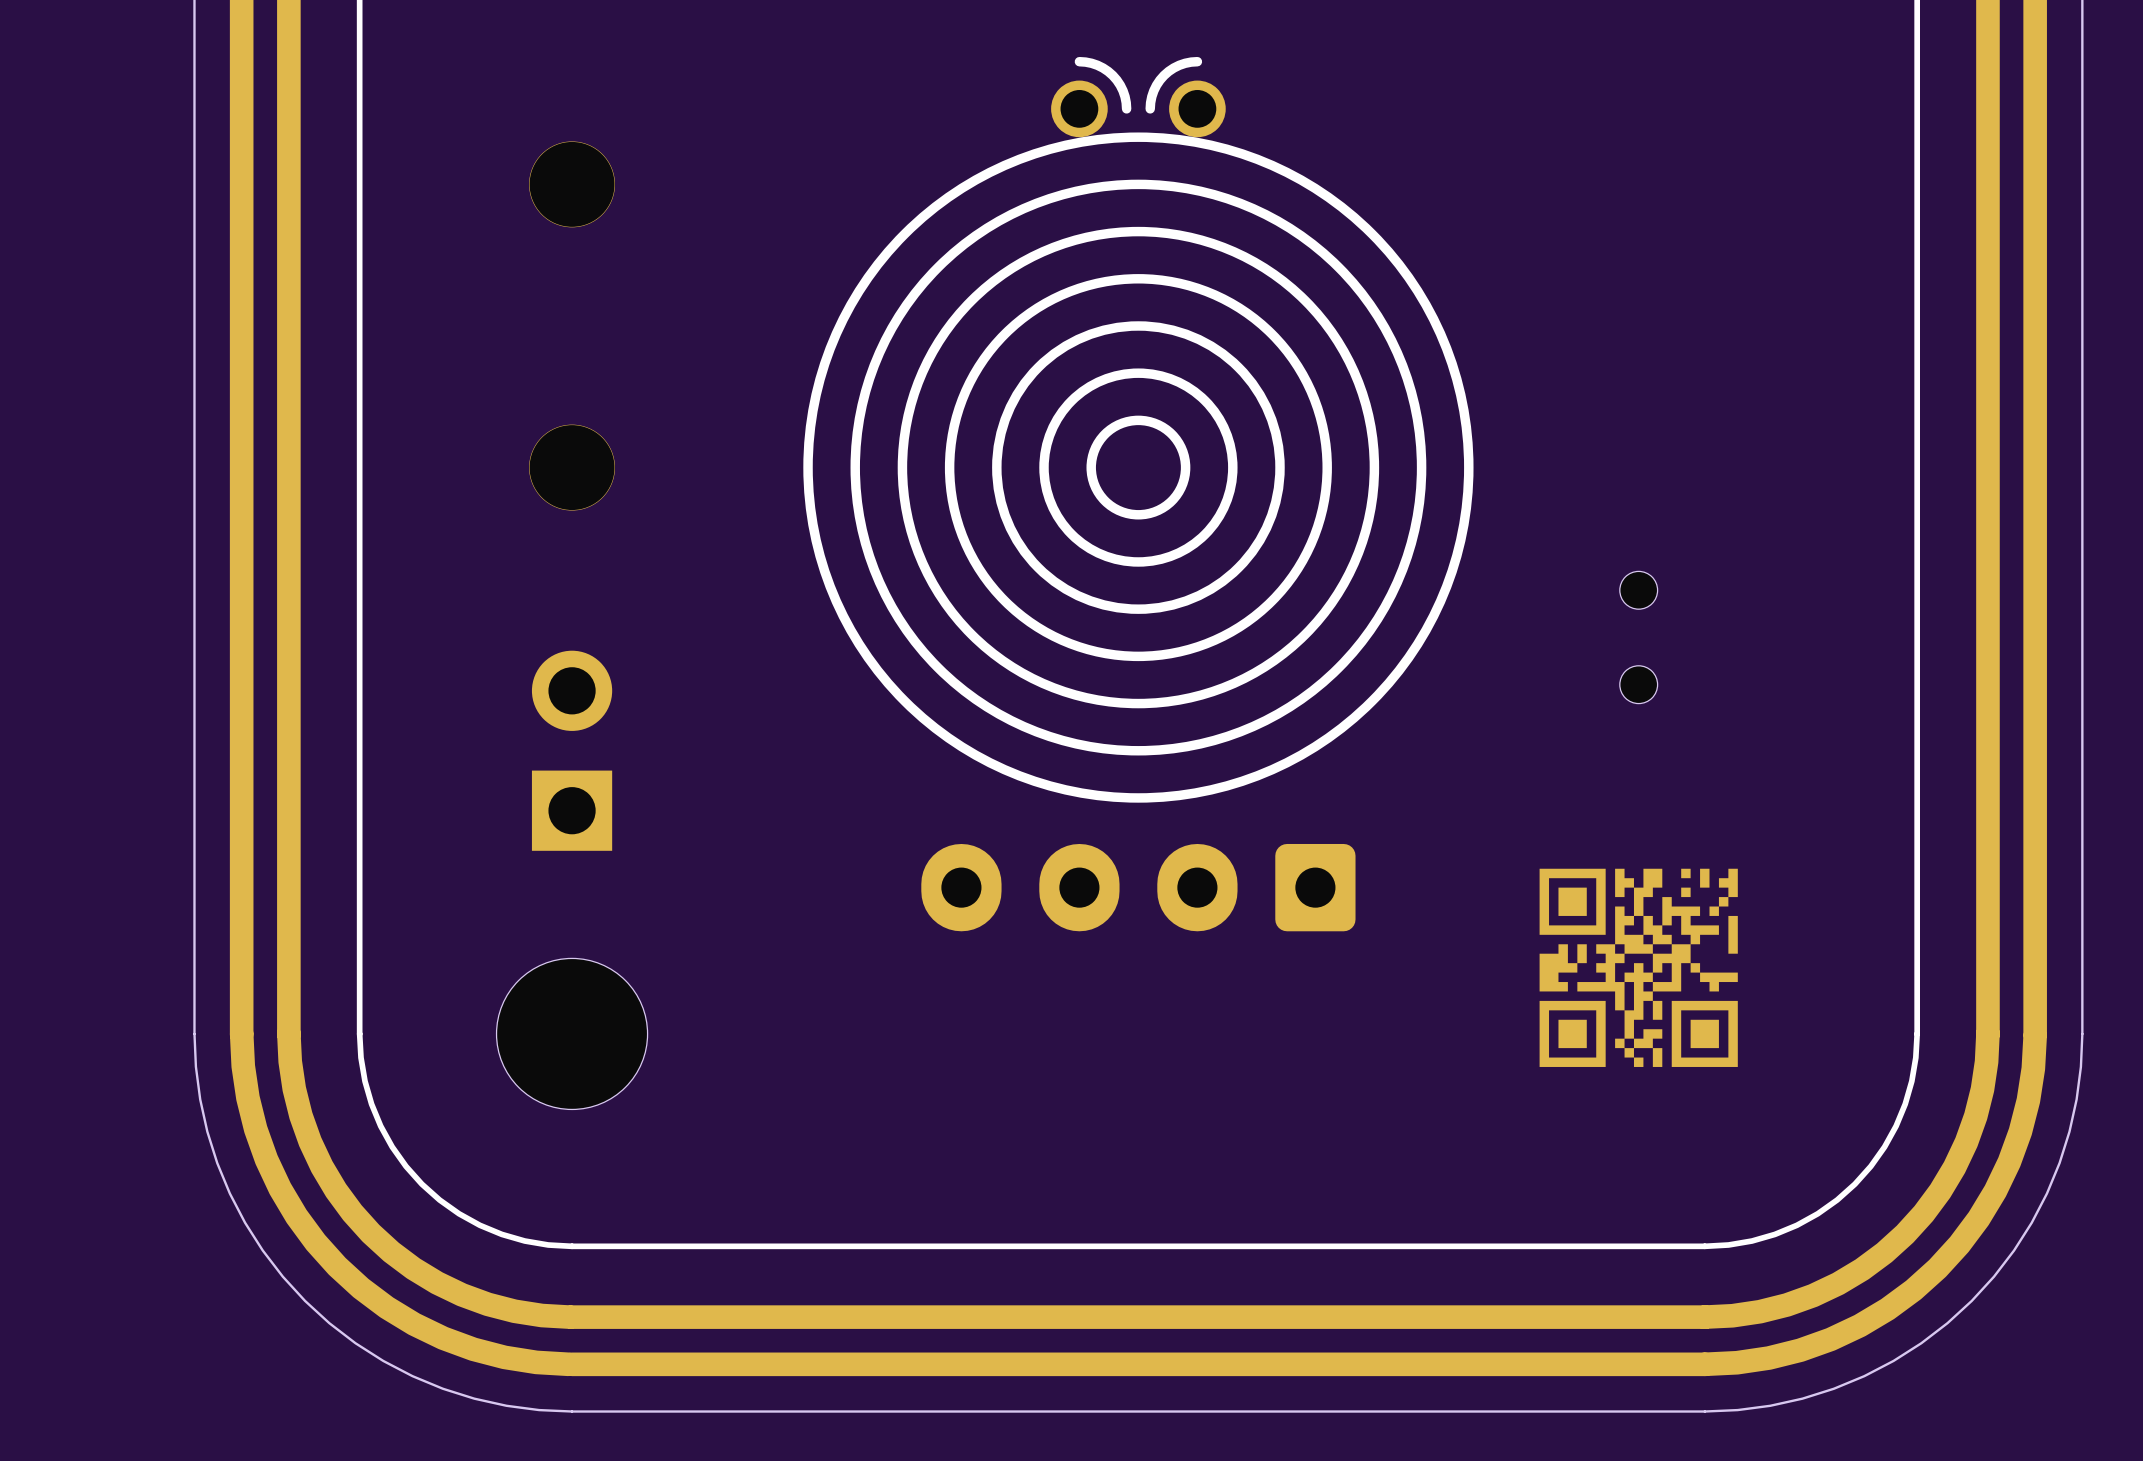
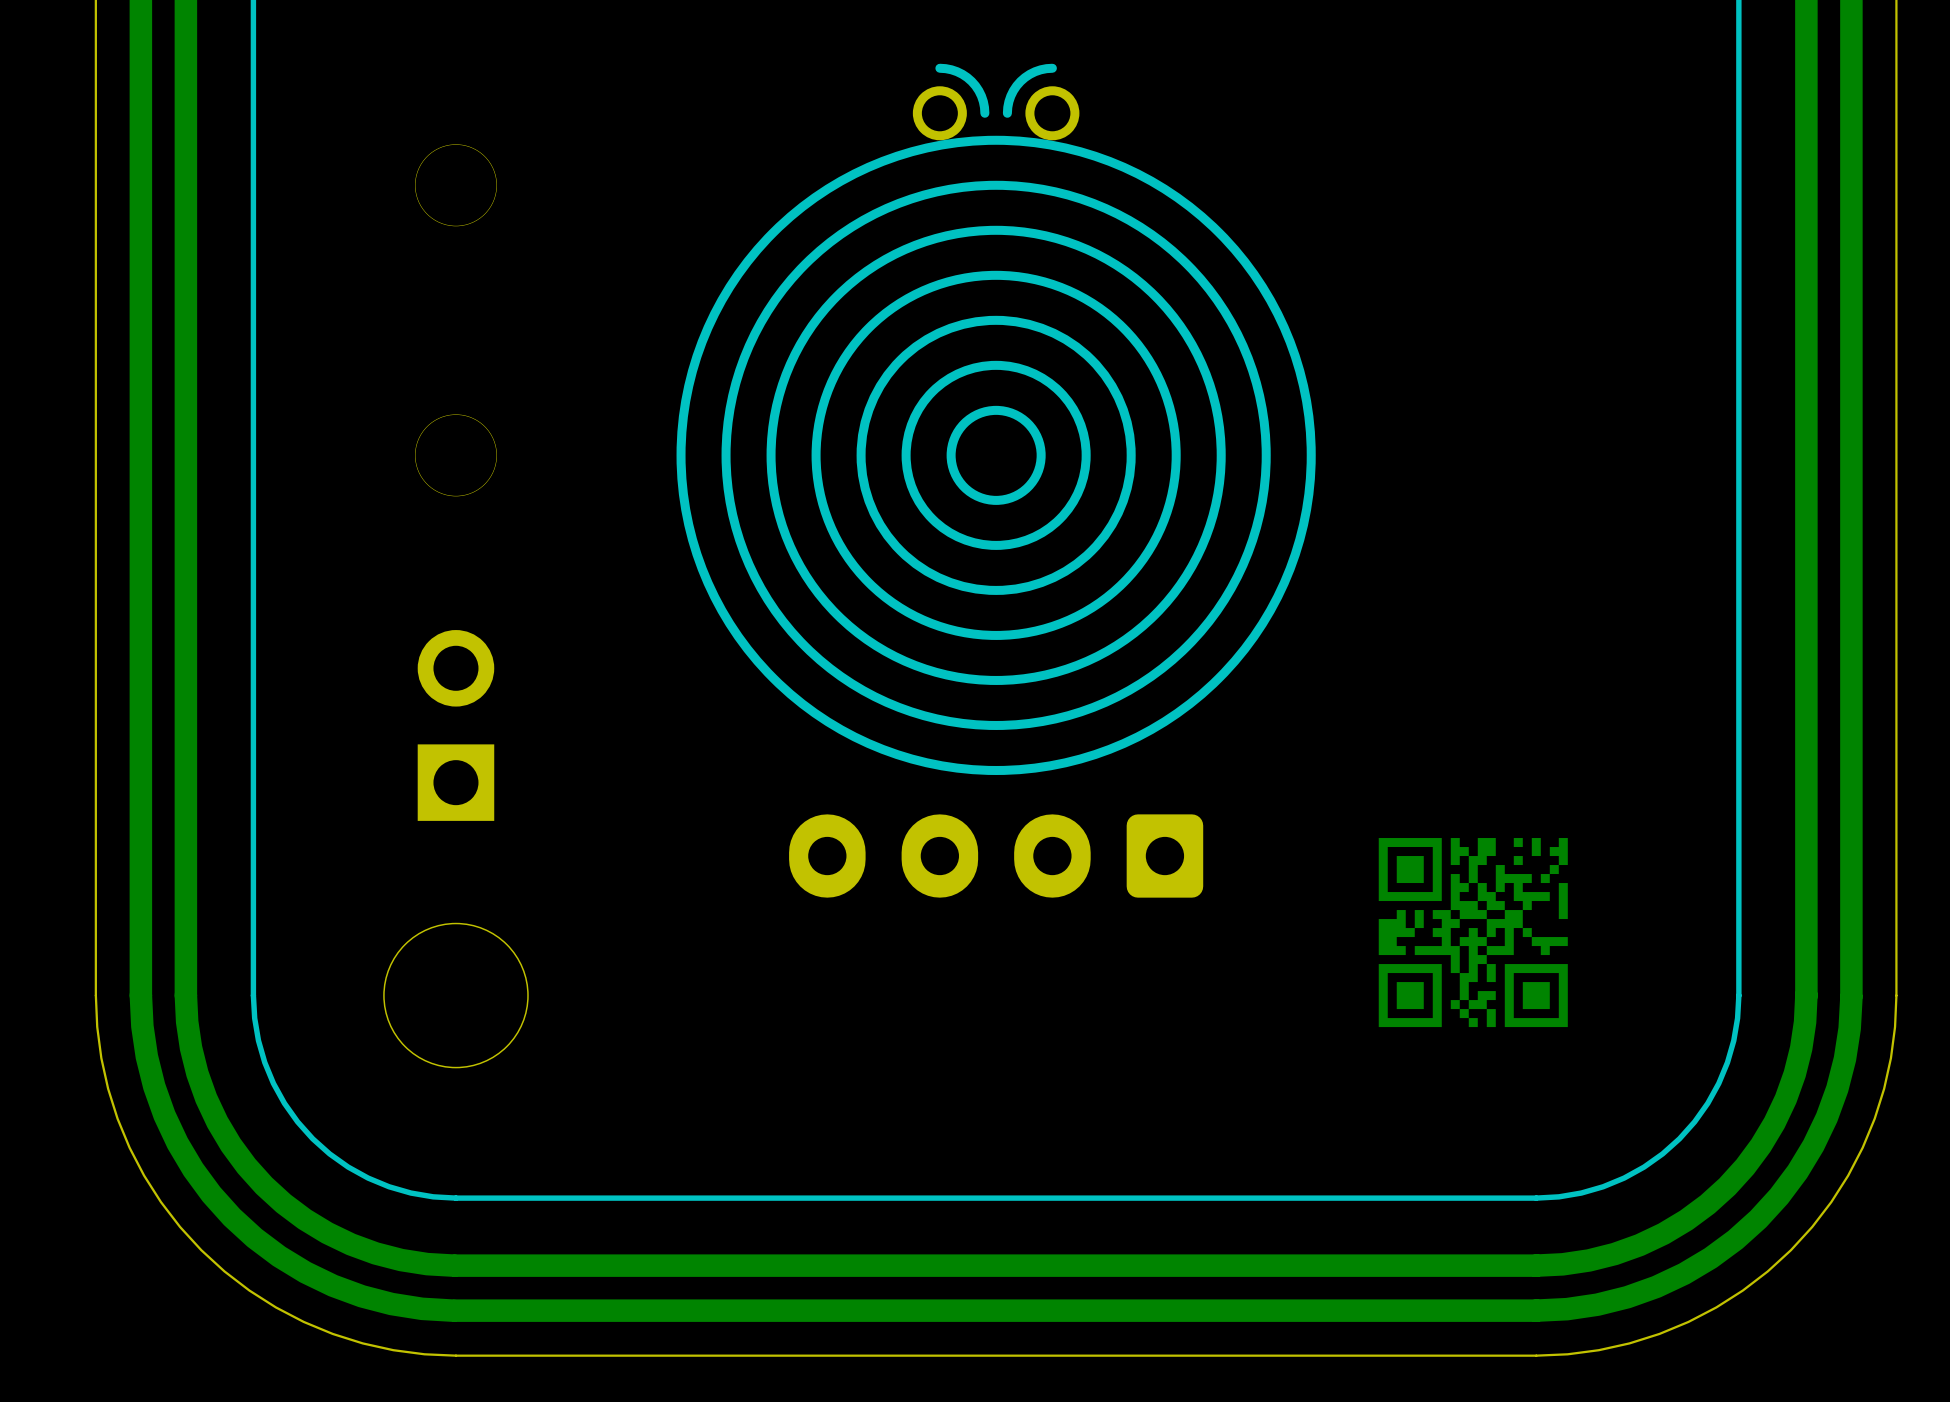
part: (1638, 637) -> none

